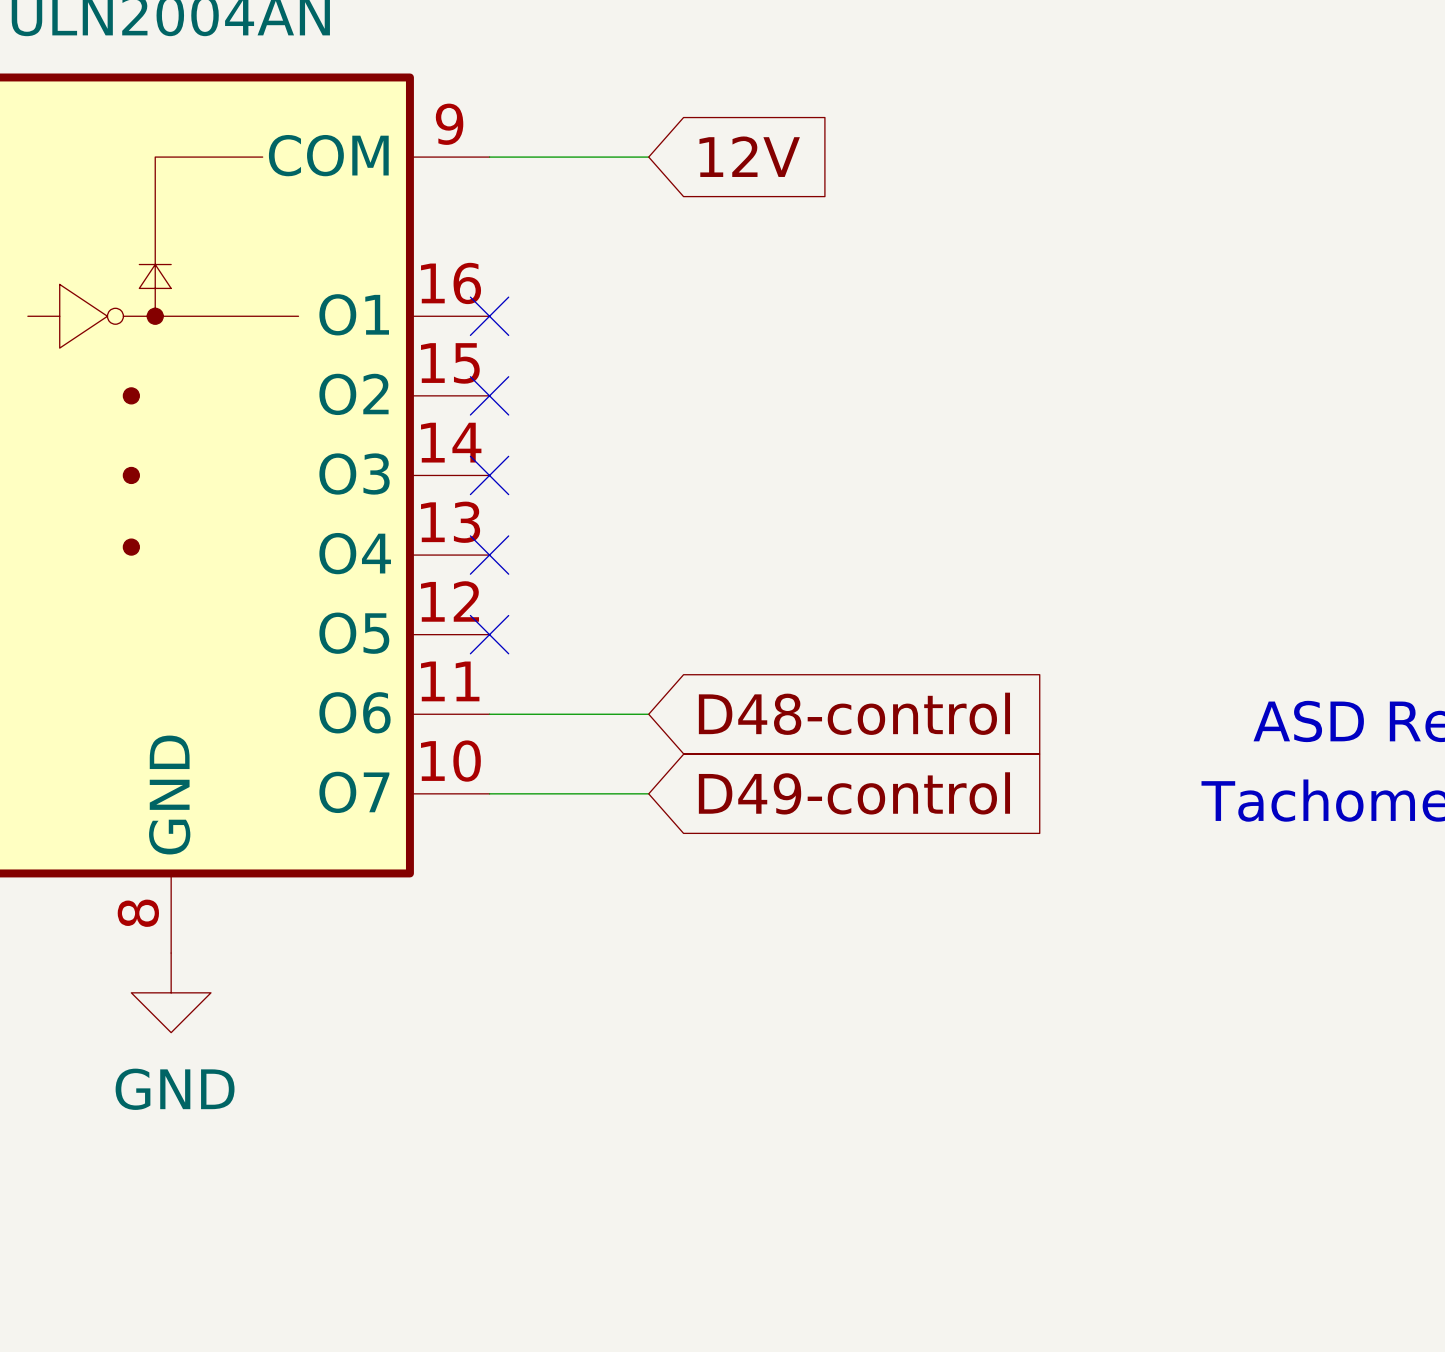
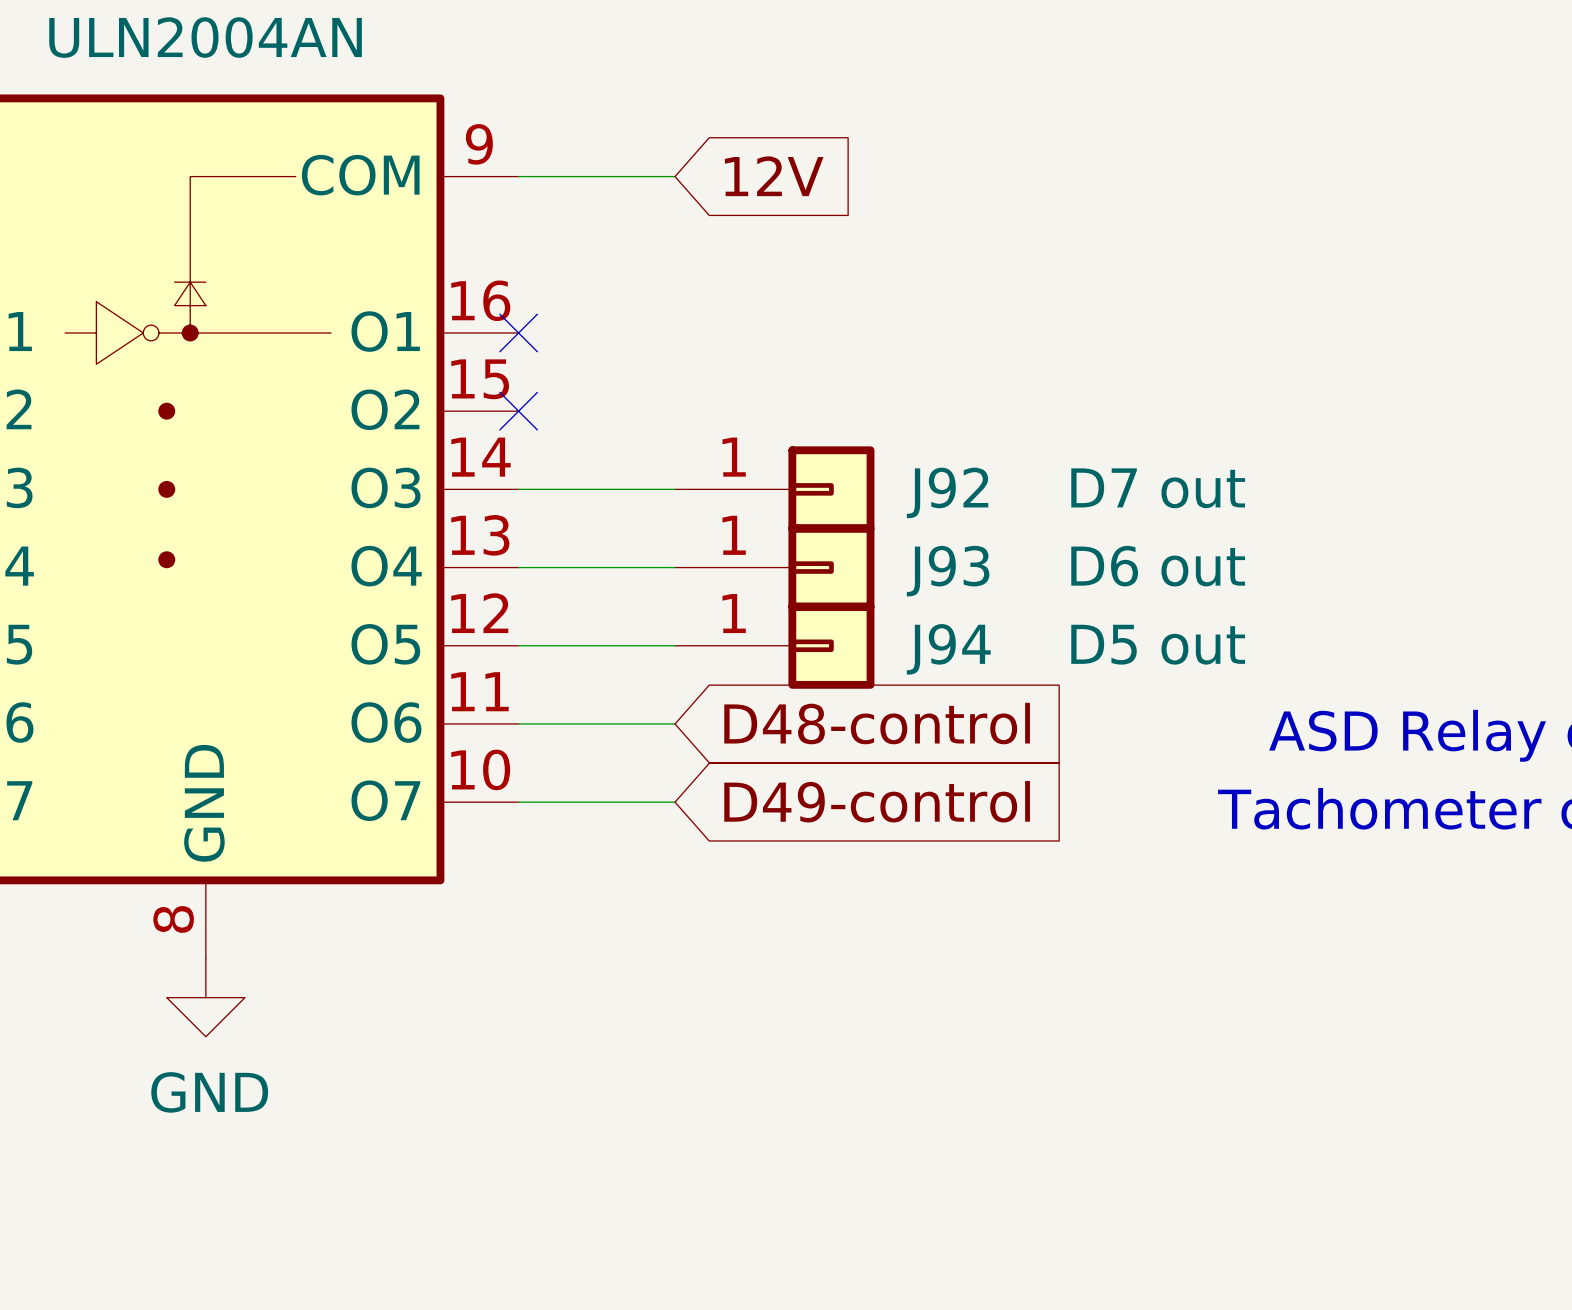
wire: none -> (518, 489) (675, 489)
no-connect mark: (489, 475) -> none
J92: none -> D7 out (774, 489)
wire: none -> (518, 567) (675, 567)
no-connect mark: (489, 555) -> none
J93: none -> D6 out (774, 567)
wire: none -> (518, 645) (675, 645)
no-connect mark: (489, 634) -> none
J94: none -> D5 out (774, 645)

